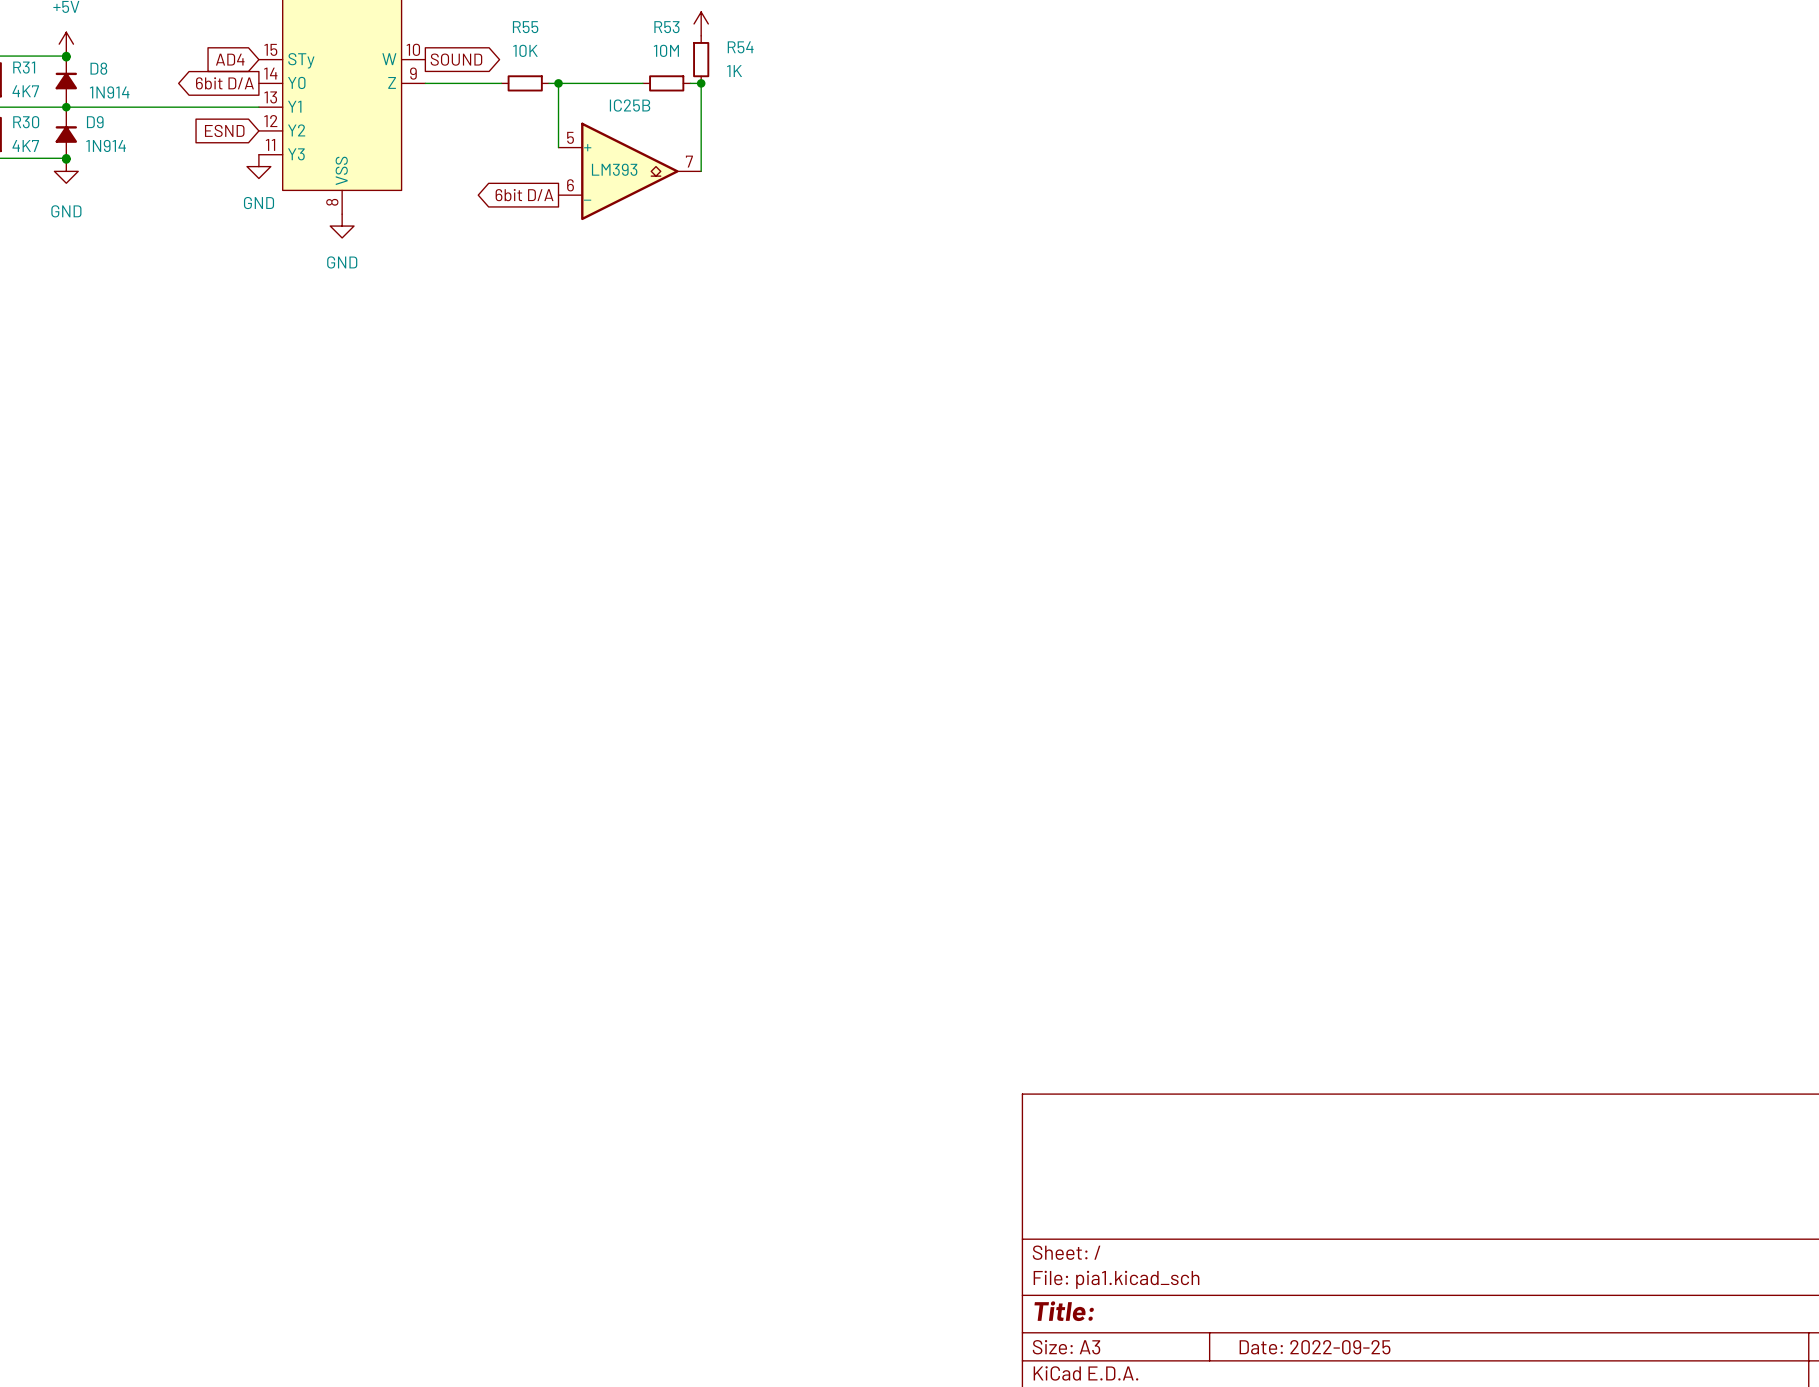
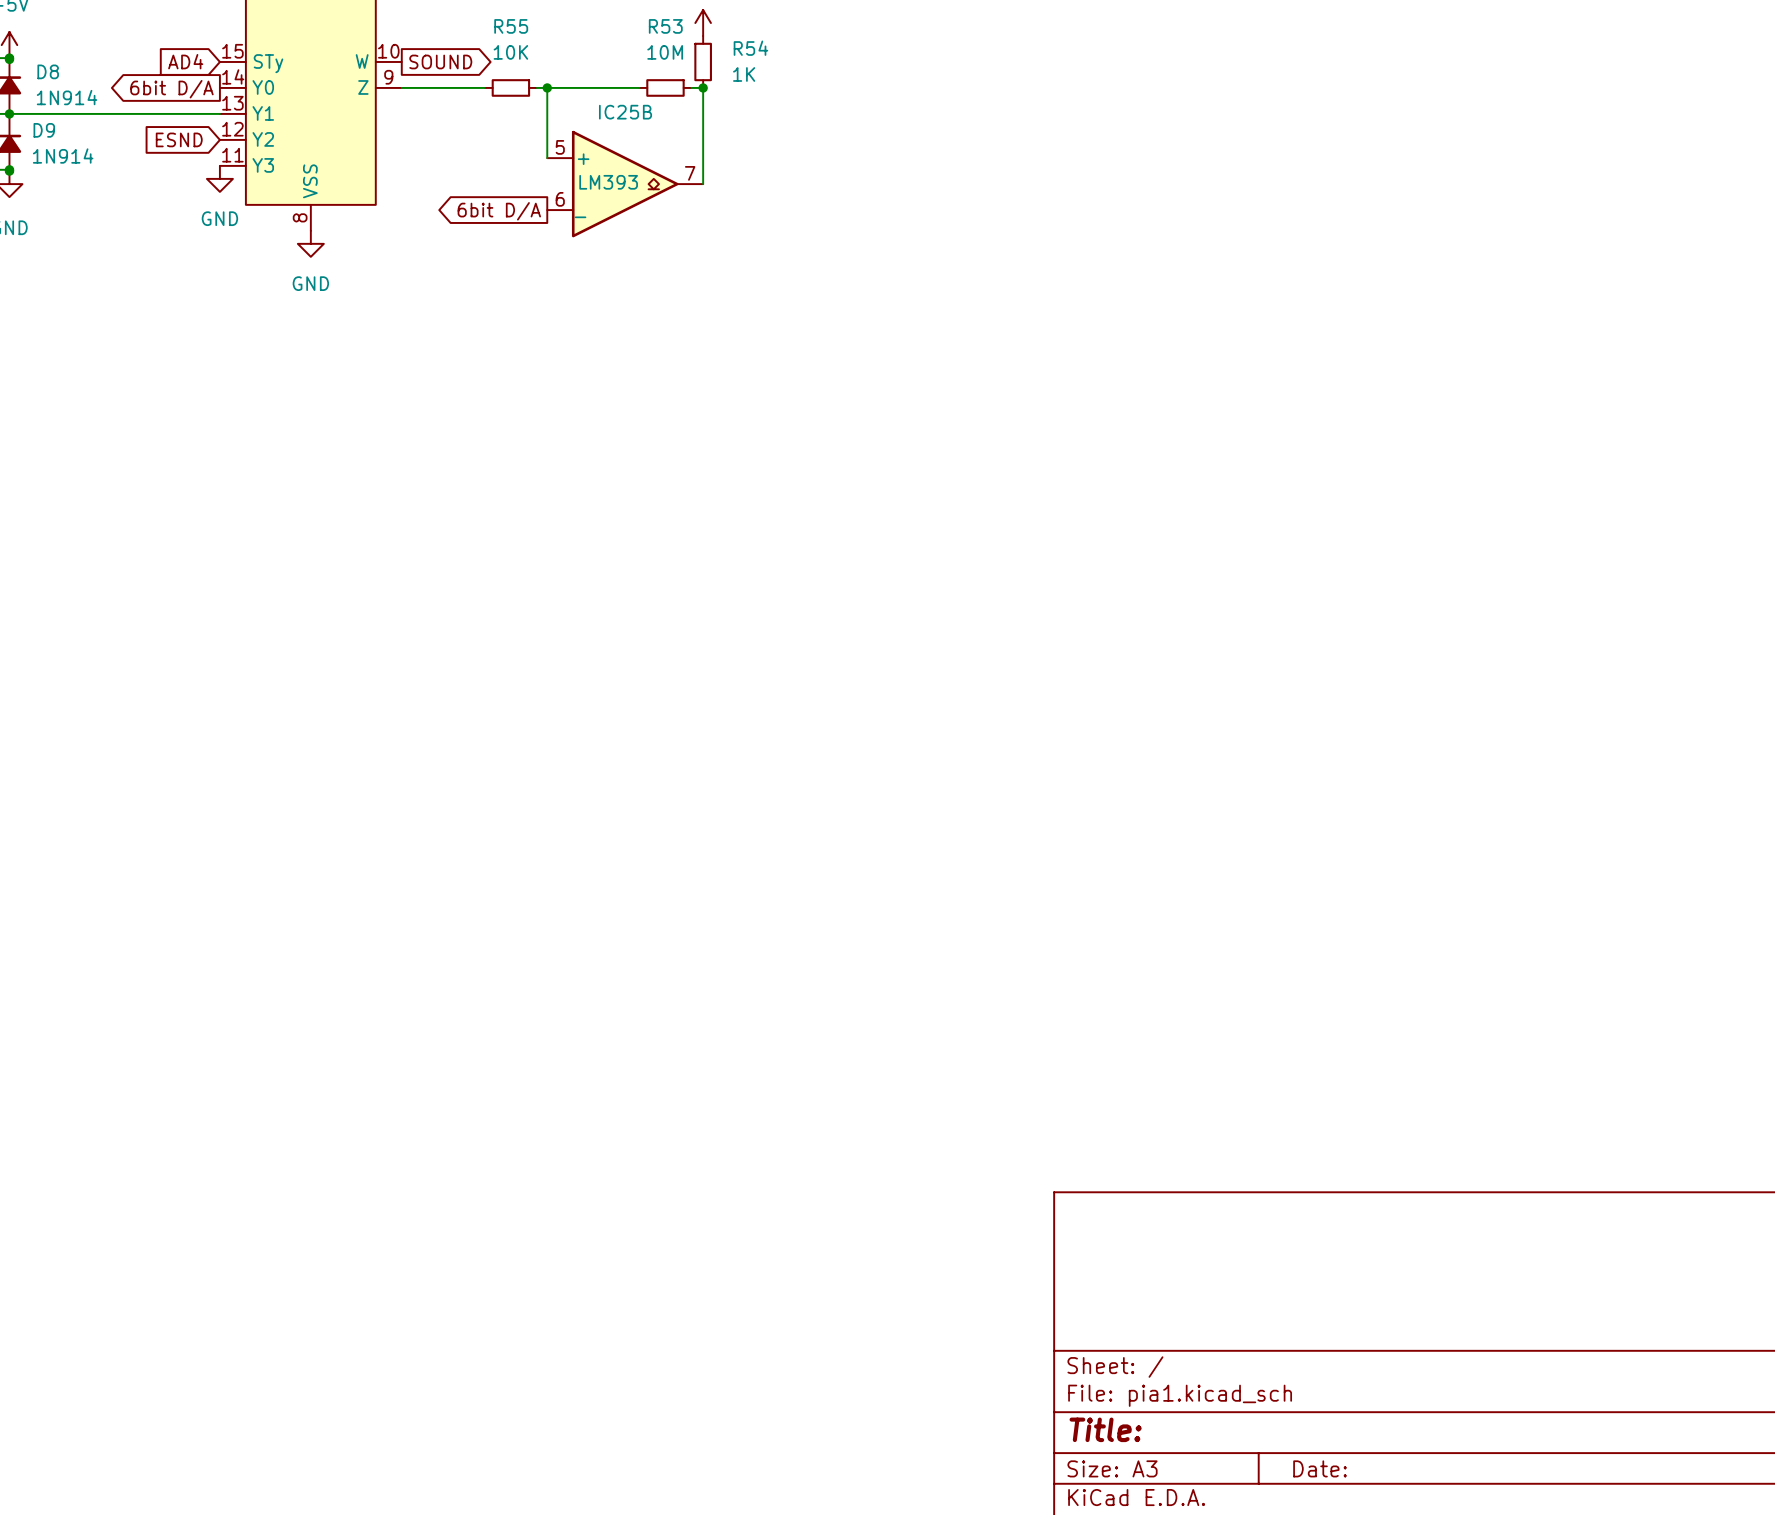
title block: Date: 2022-09-25 (1315, 1347) -> Date: (1320, 1468)

